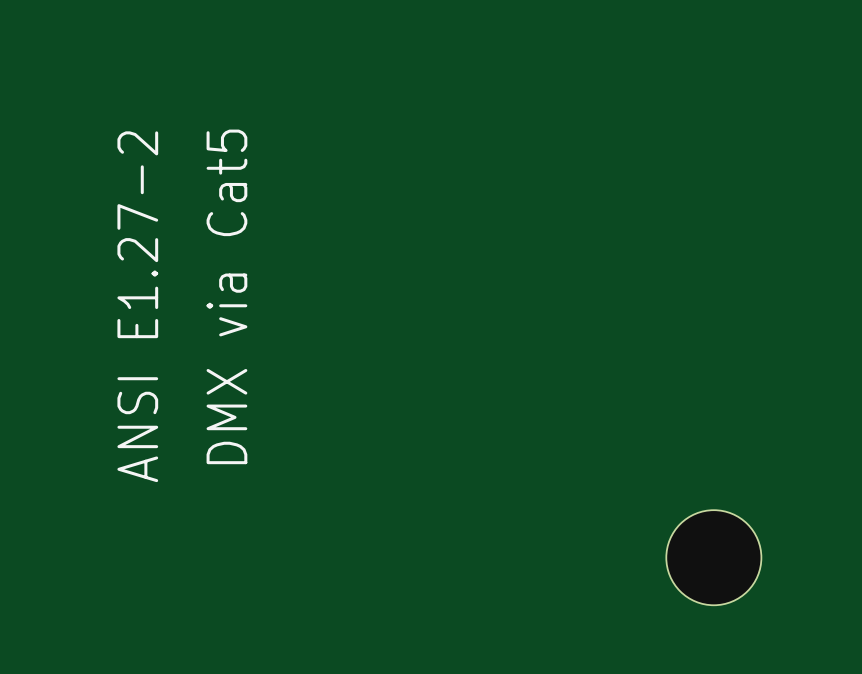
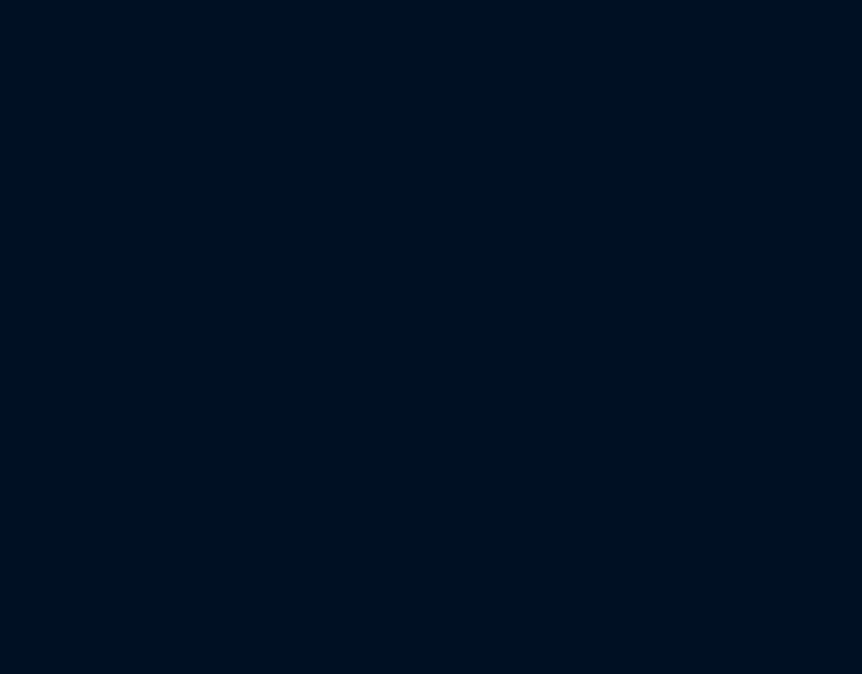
text: DMX via Cat5 (226, 296) -> none
text: ANSI E1.27-2 (137, 306) -> none
hole: (713, 557) -> none

